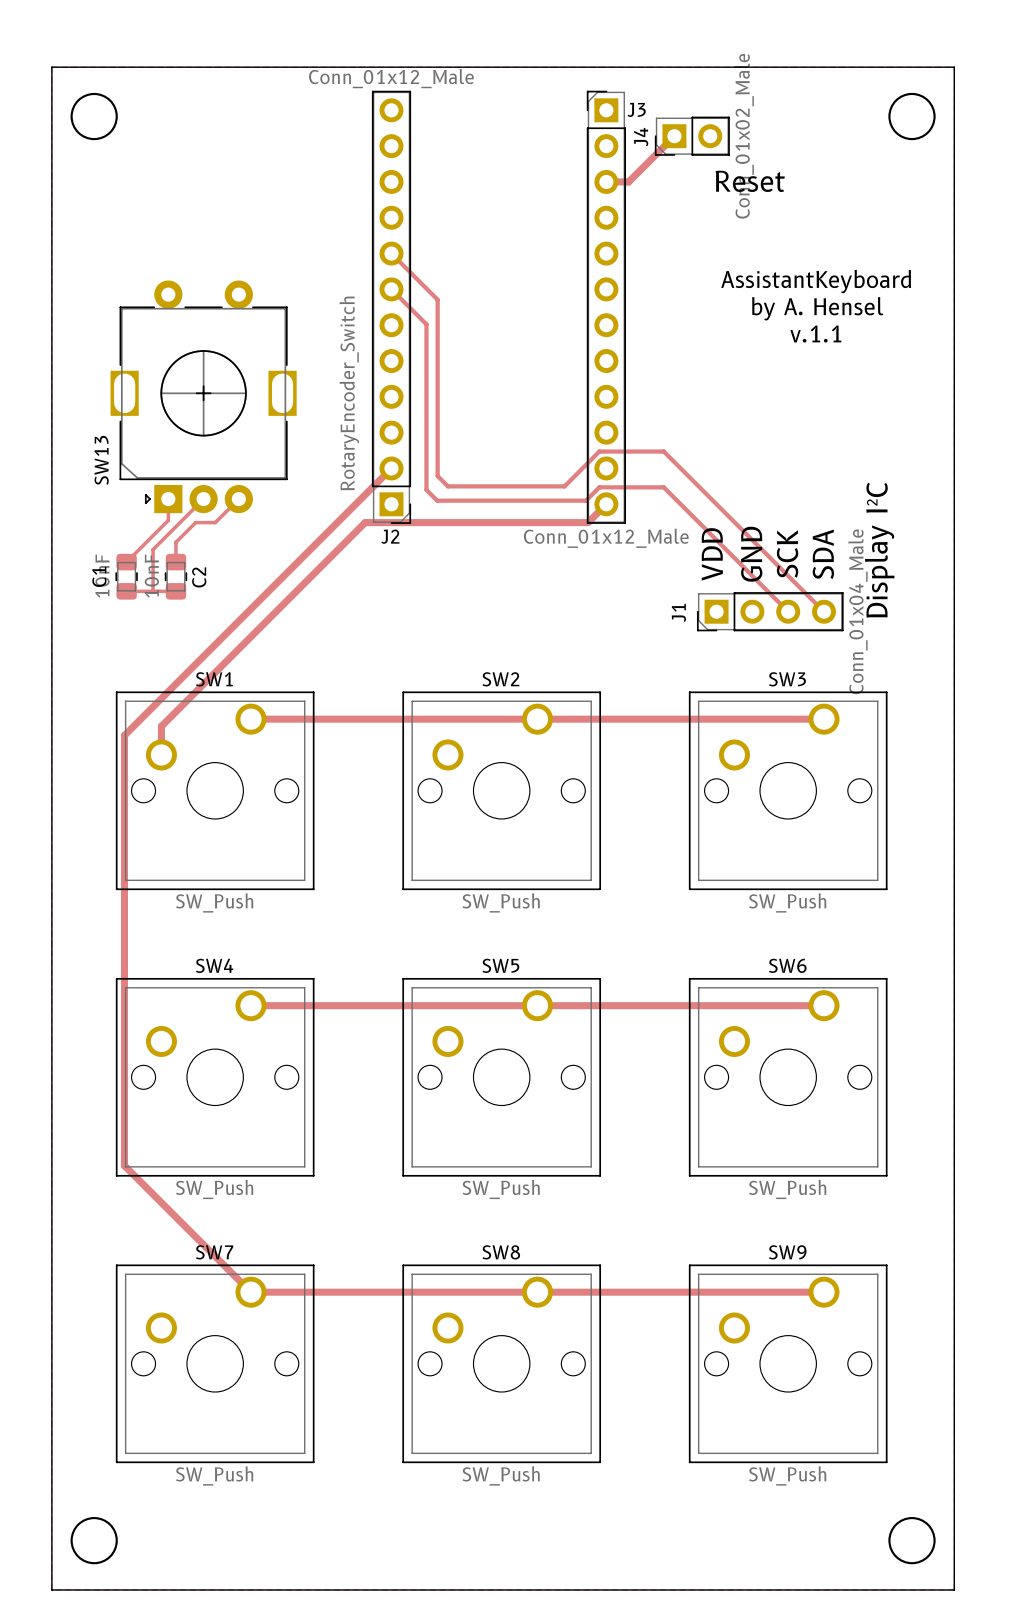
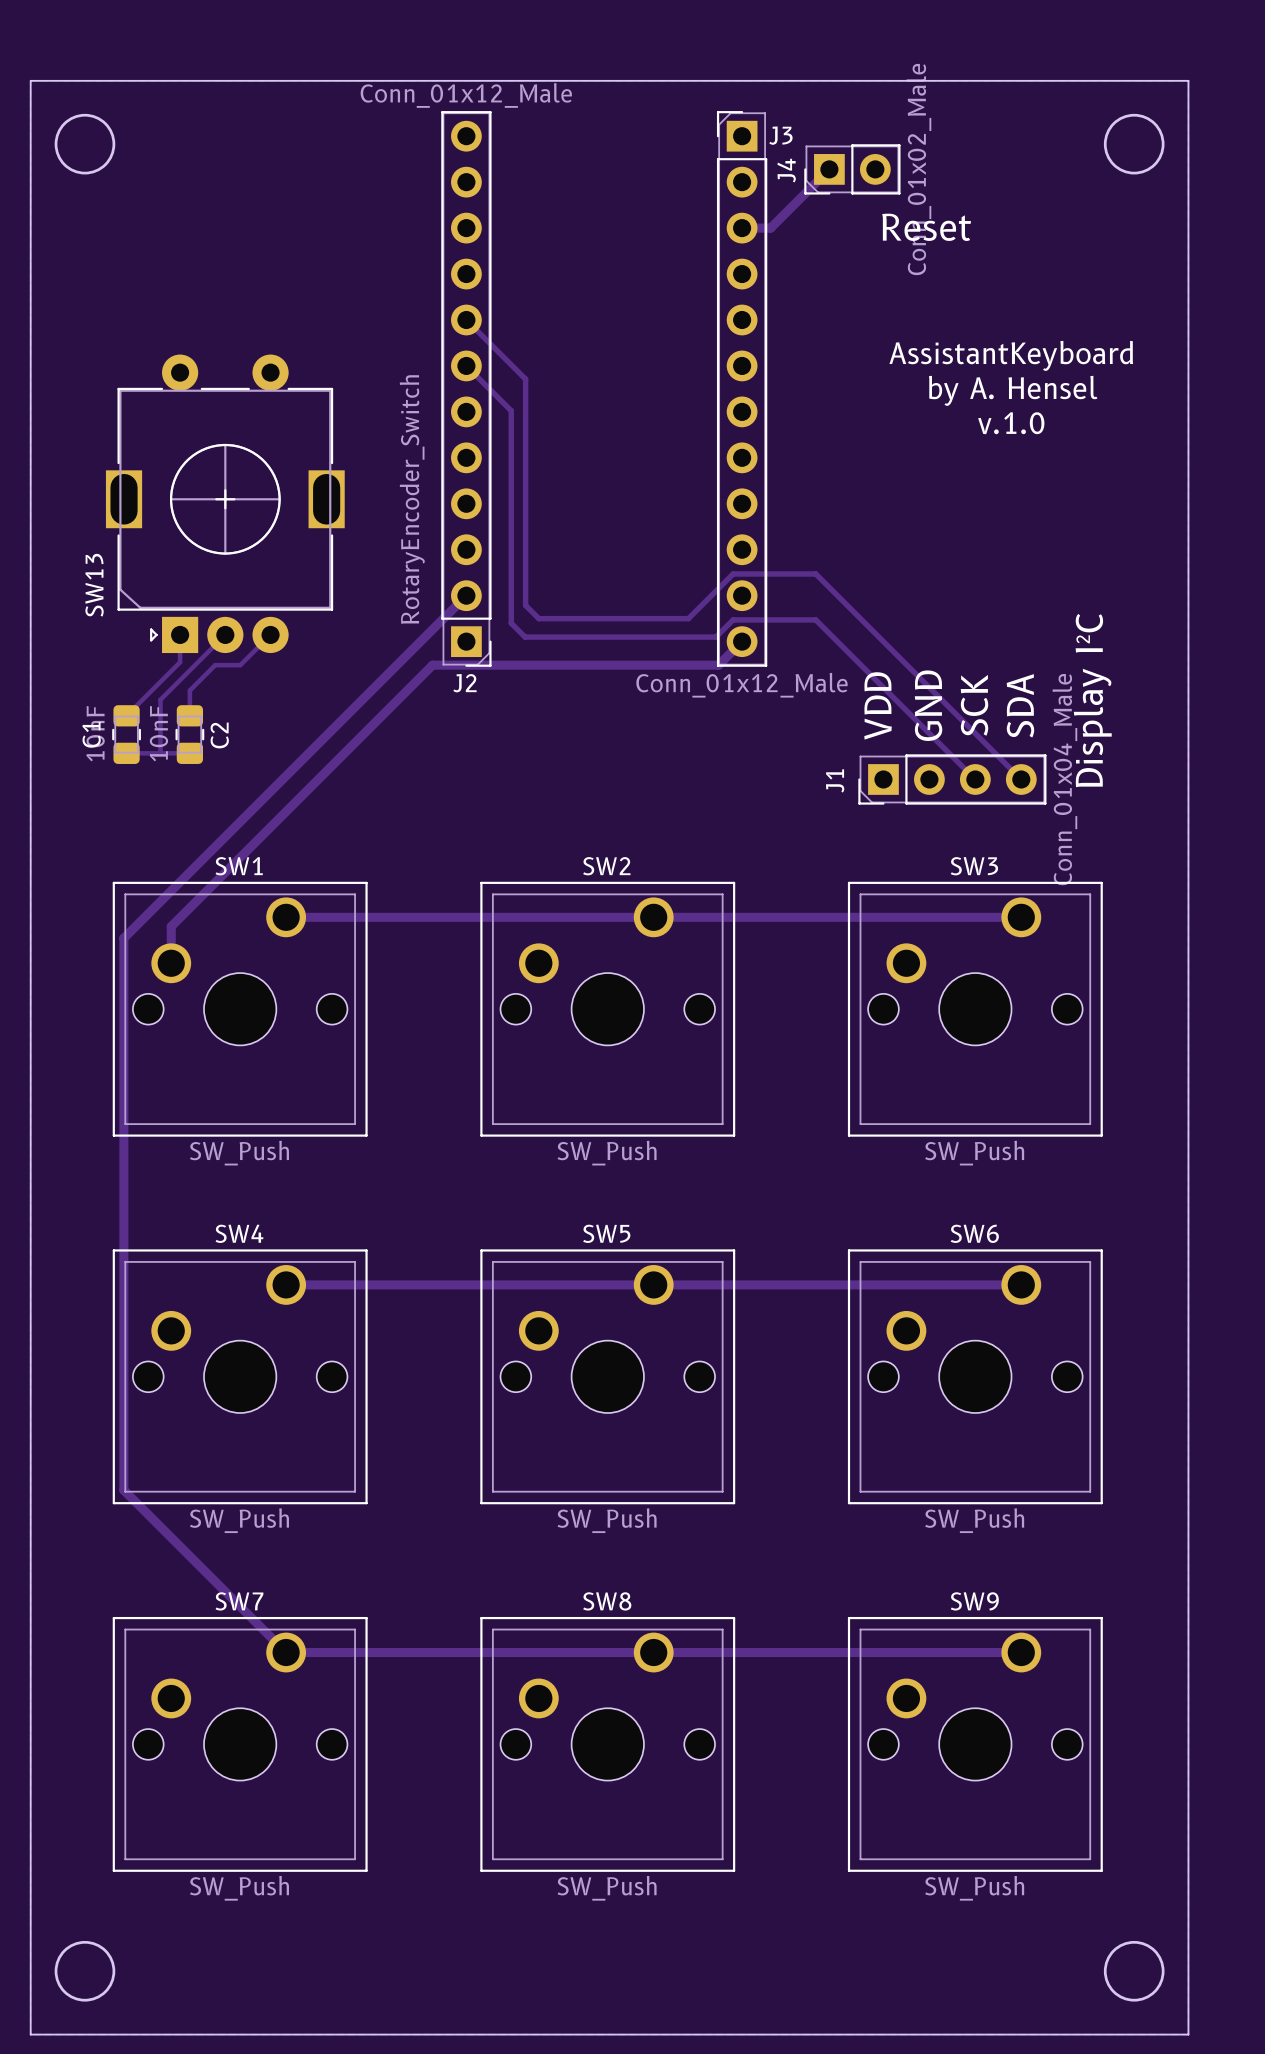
text: v.1.1 (815, 334) -> v.1.0 (1011, 423)

